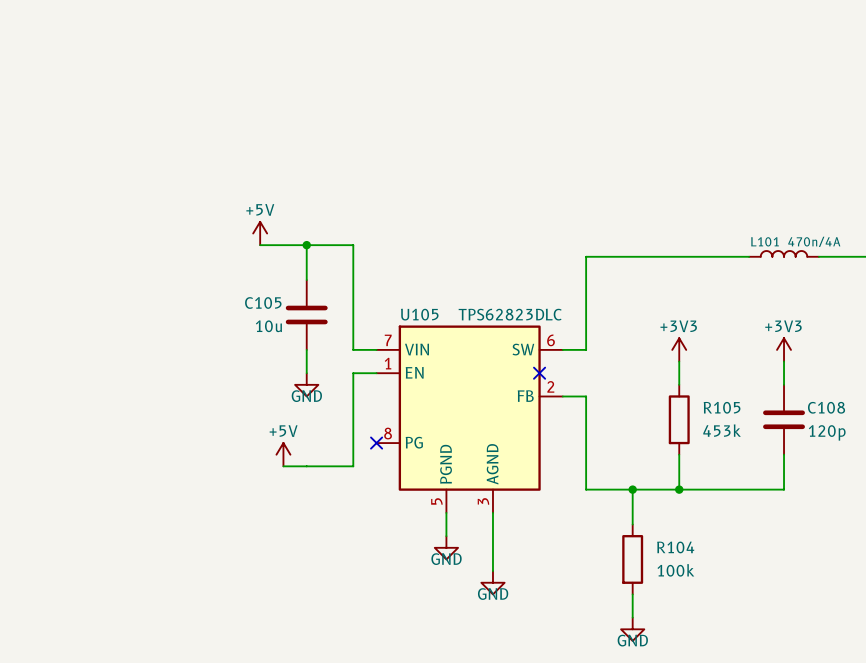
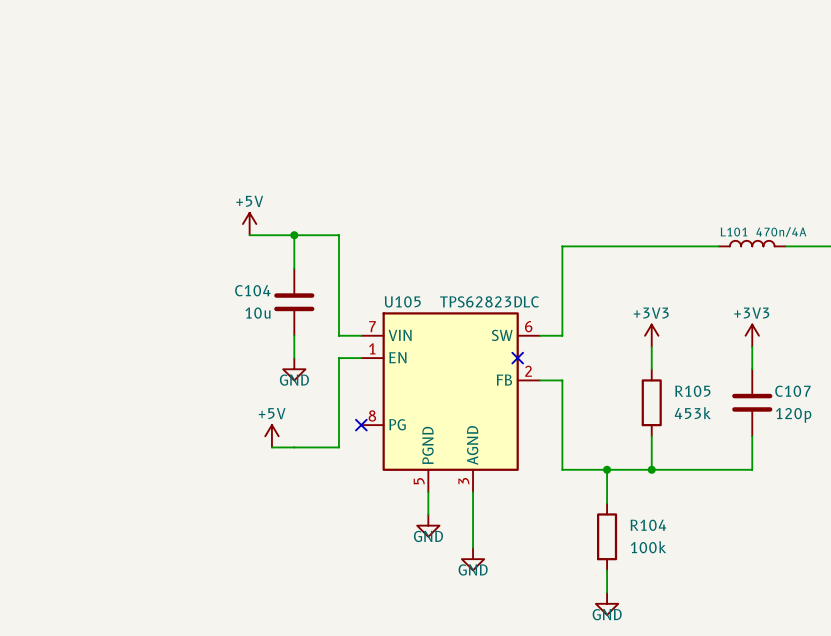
C105 name: C105 (263, 302) -> C104 (252, 290)
C108 name: C108 (826, 407) -> C107 (792, 391)

